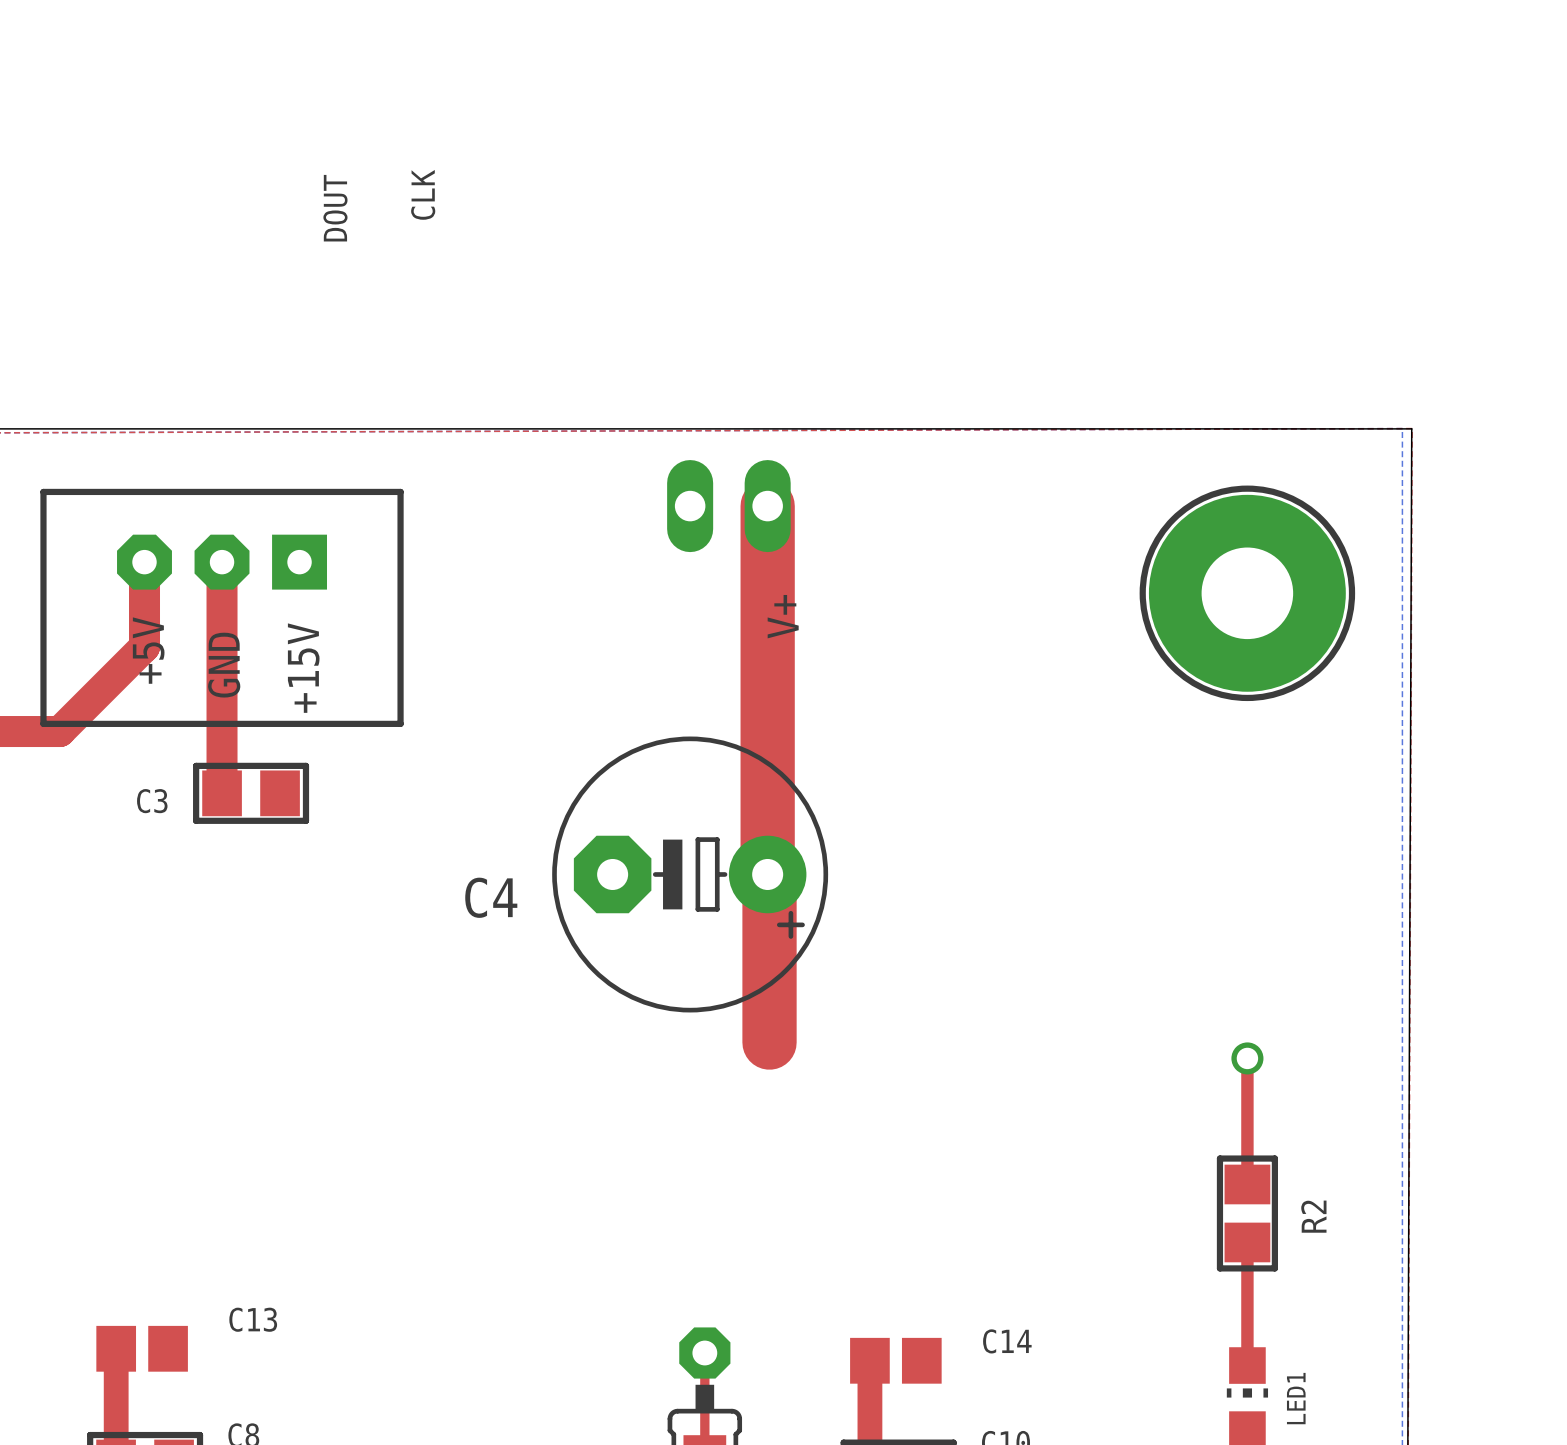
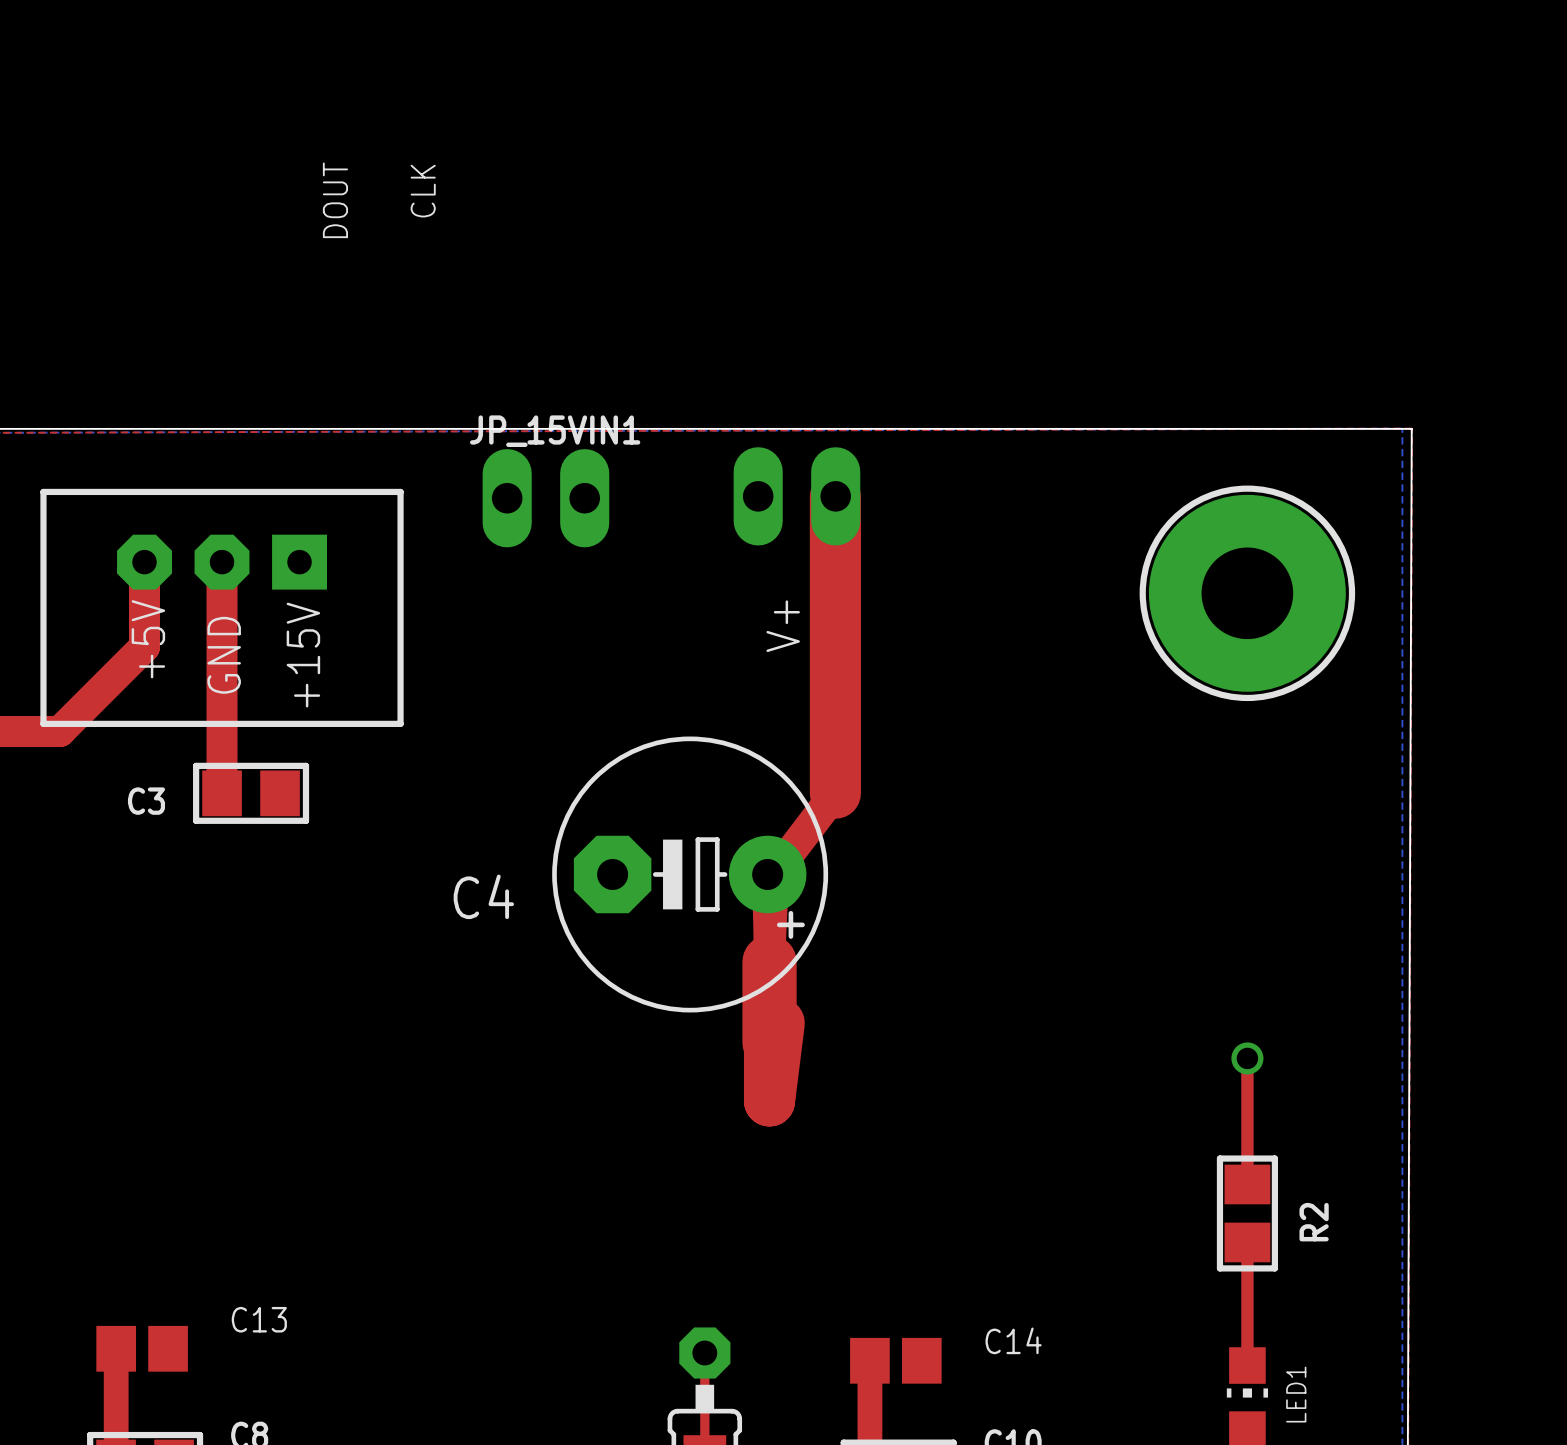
part: none -> (796, 496)
top track: none -> (835, 496) (835, 793) (773, 874) (769, 961) (767, 874)
JP_15VIN1: none -> (545, 498)
part: (728, 506) -> none
top track: (767, 506) (767, 874) (769, 874) (769, 961) -> none
top track: none -> (779, 1023) (769, 1100) (769, 1042)

